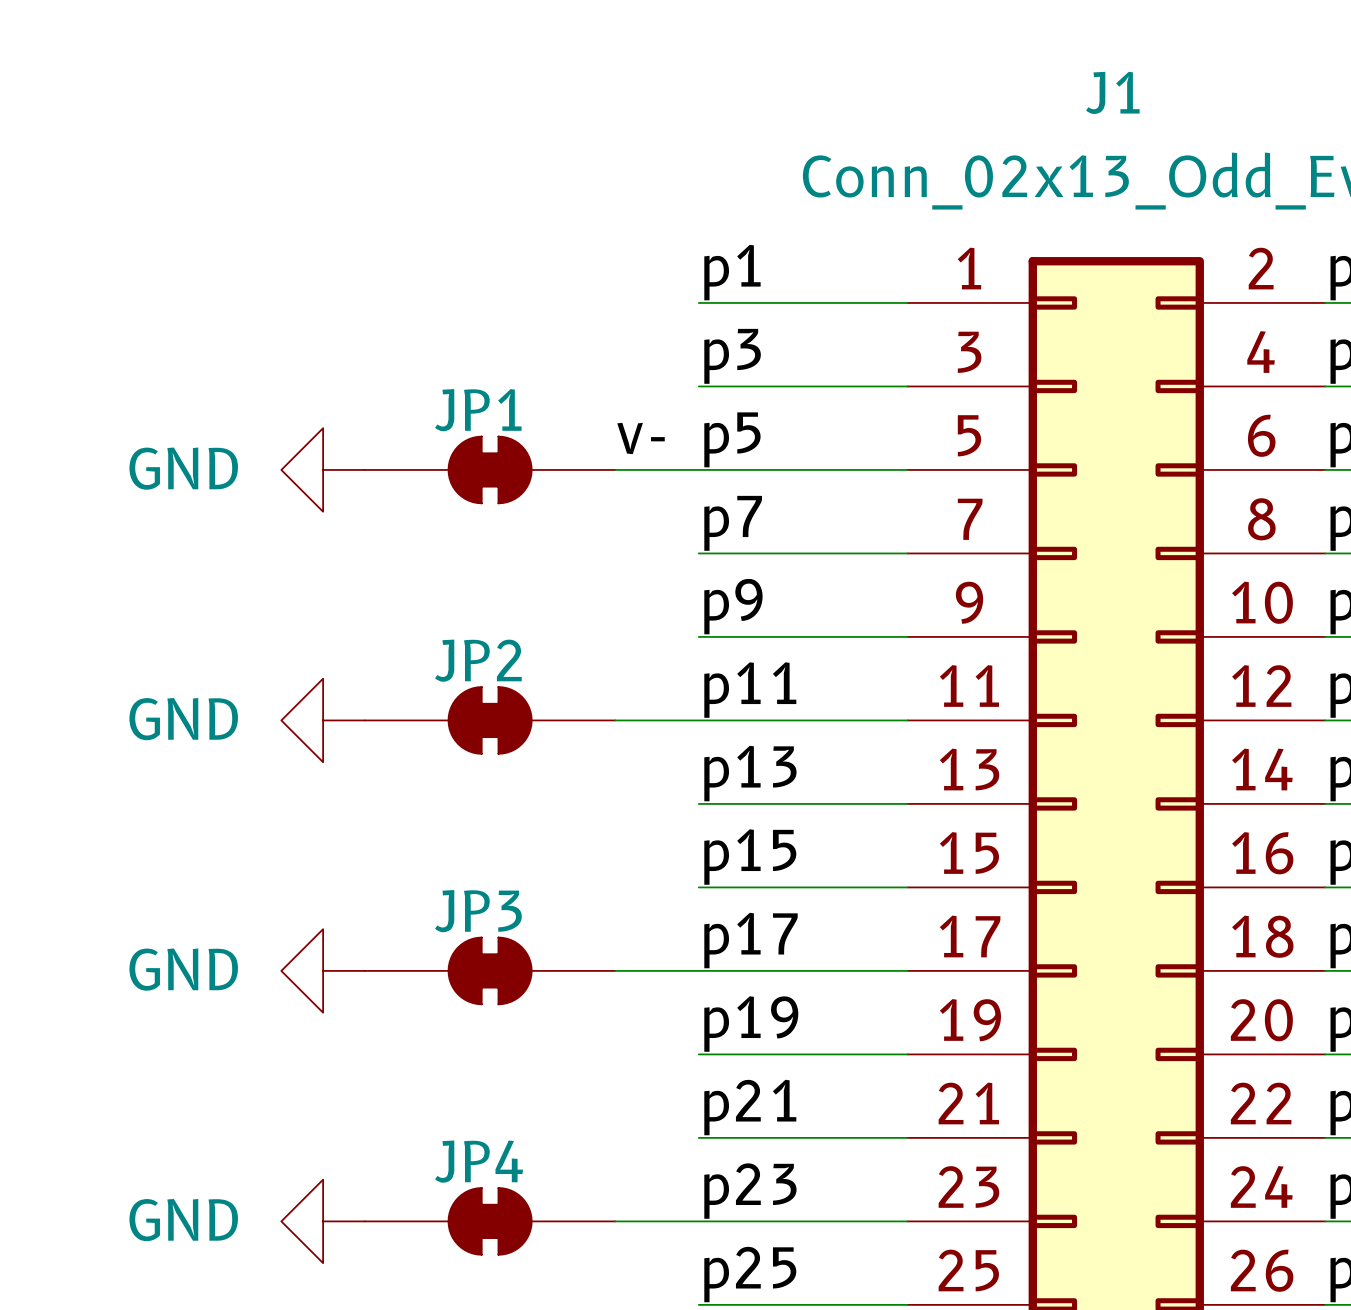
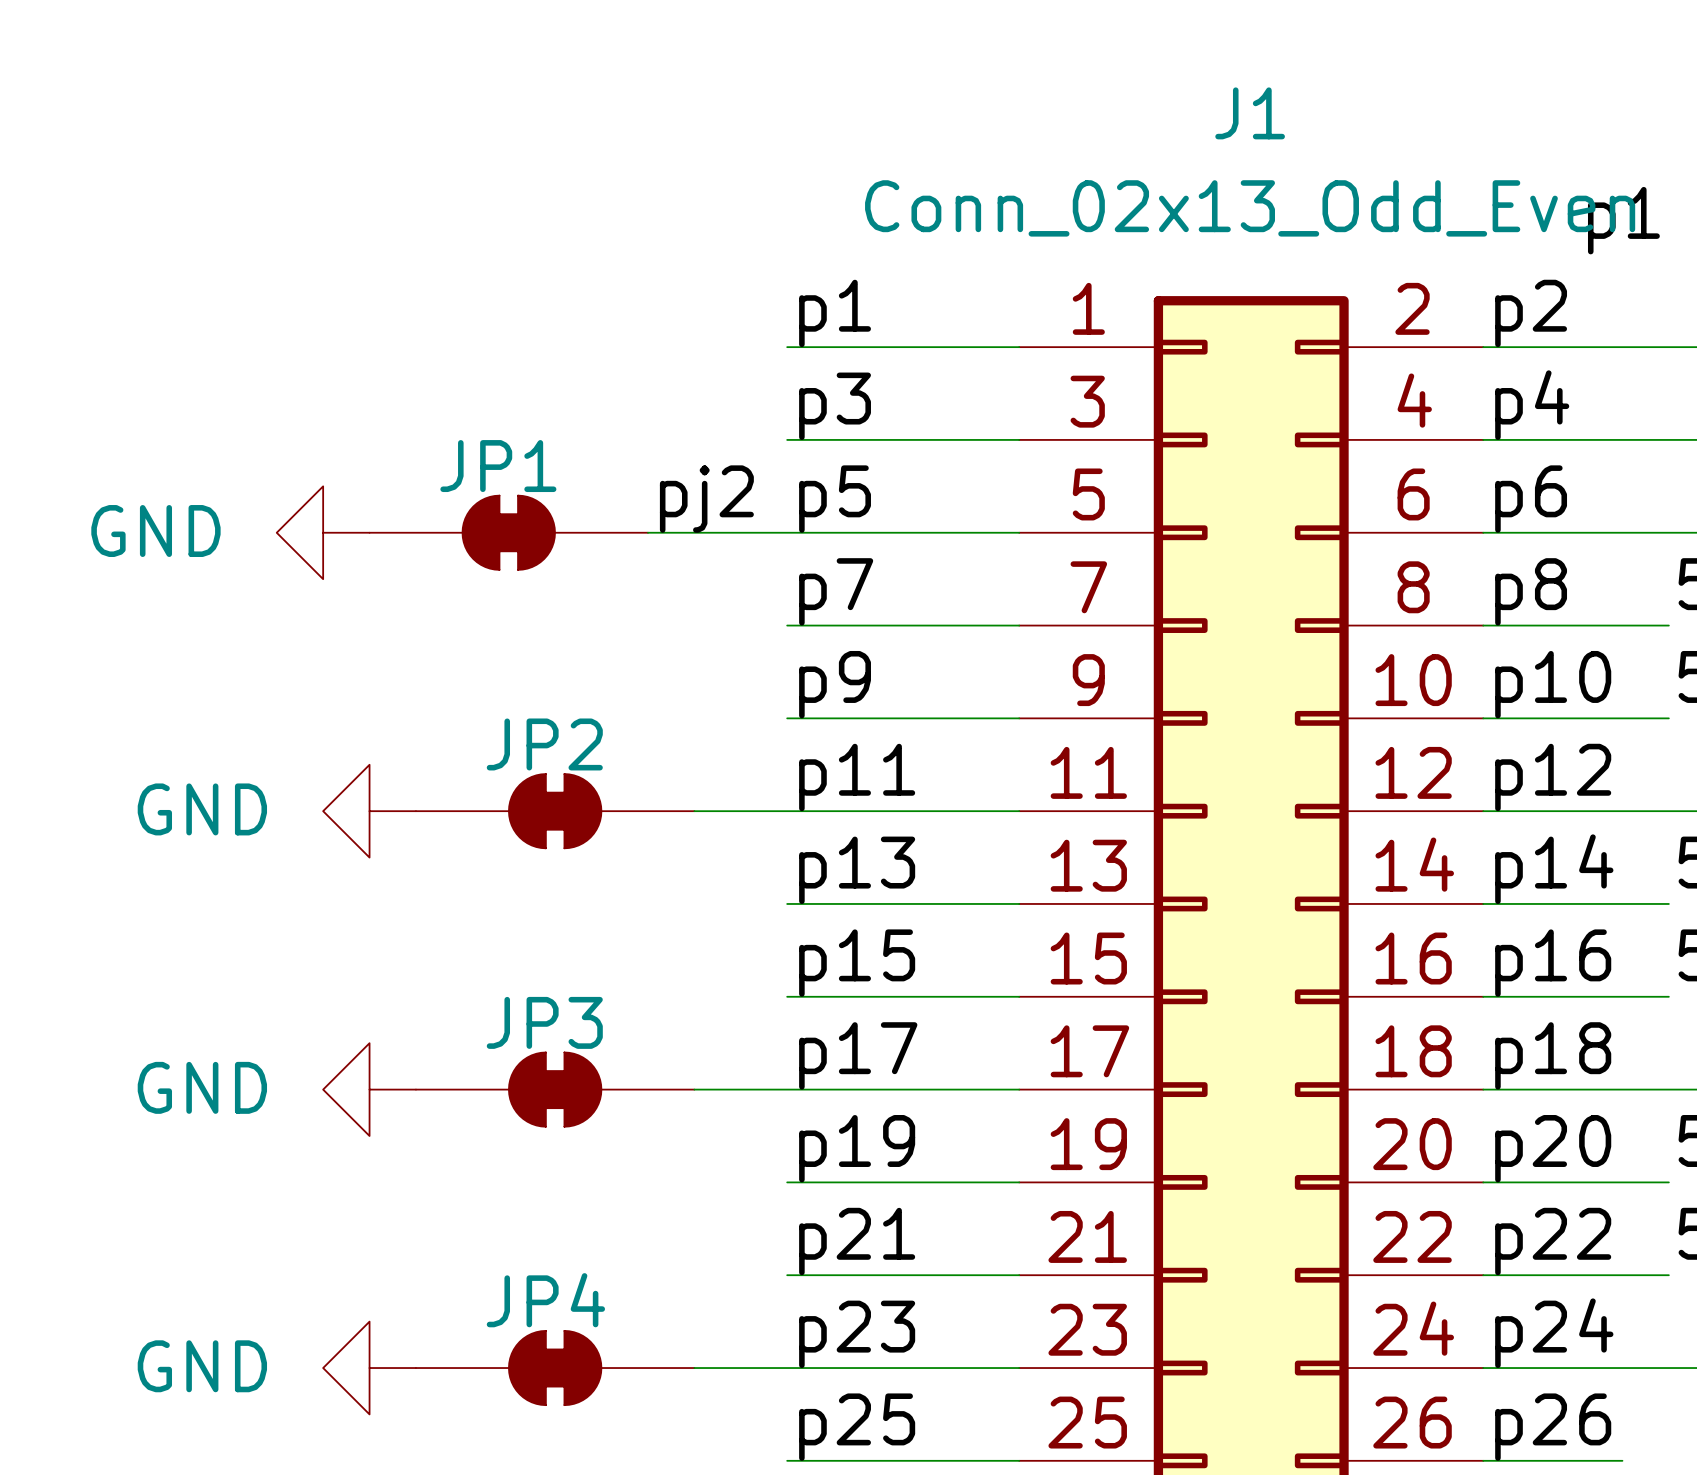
label: v- (641, 438) -> none
label: none -> pj2 (706, 499)
power symbol position: GND (323, 469) -> GND (323, 532)
JP1 position: (490, 469) -> (508, 532)

